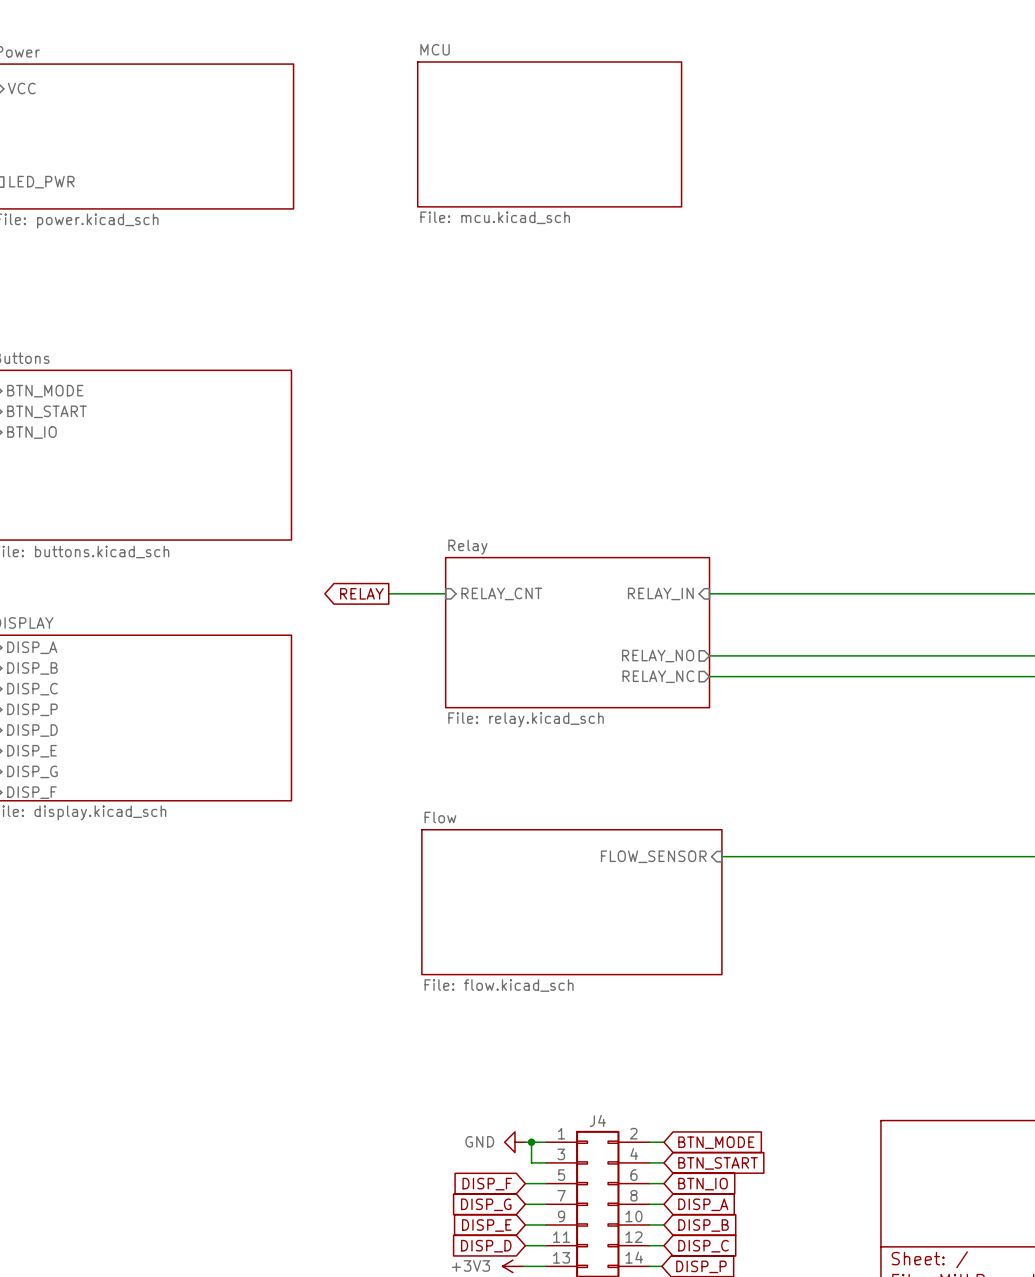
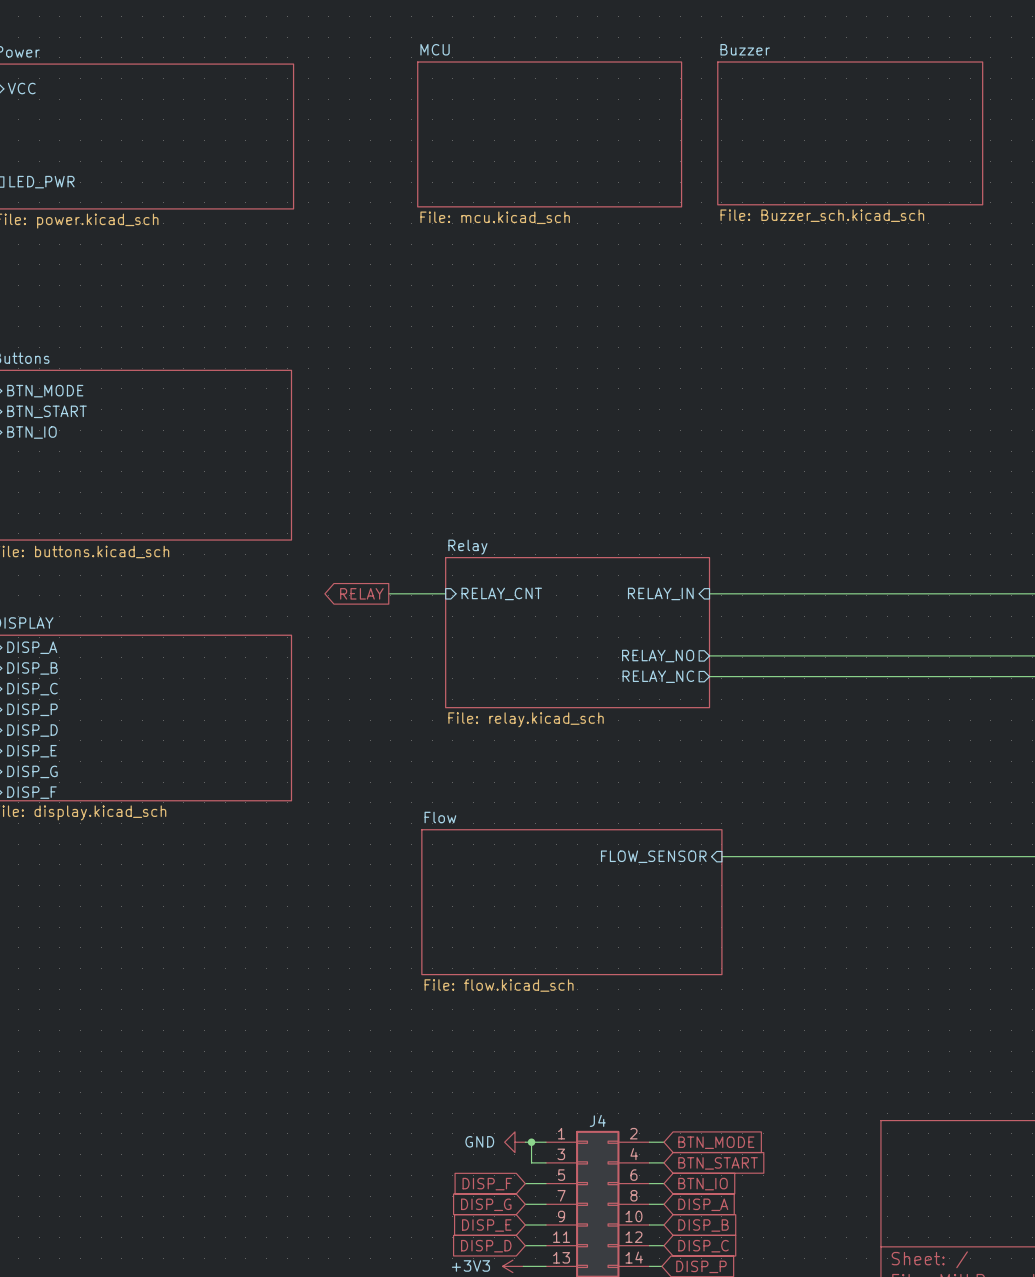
sheet Buzzer: none -> File: Buzzer_sch.kicad_sch (850, 133)

